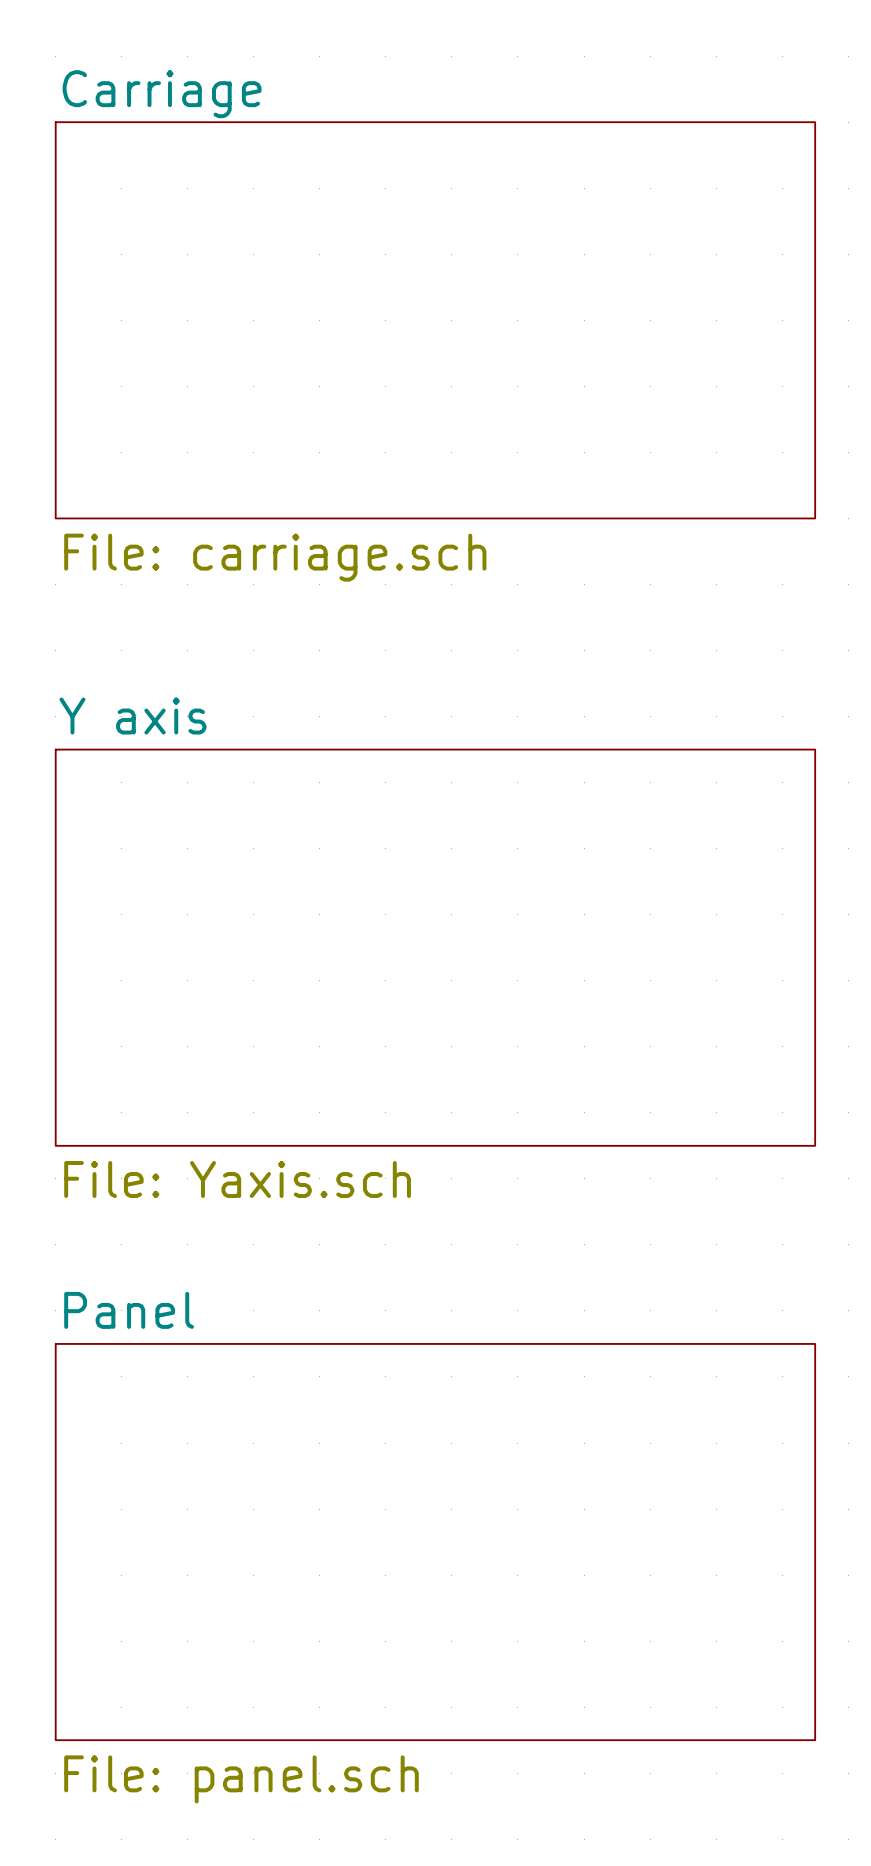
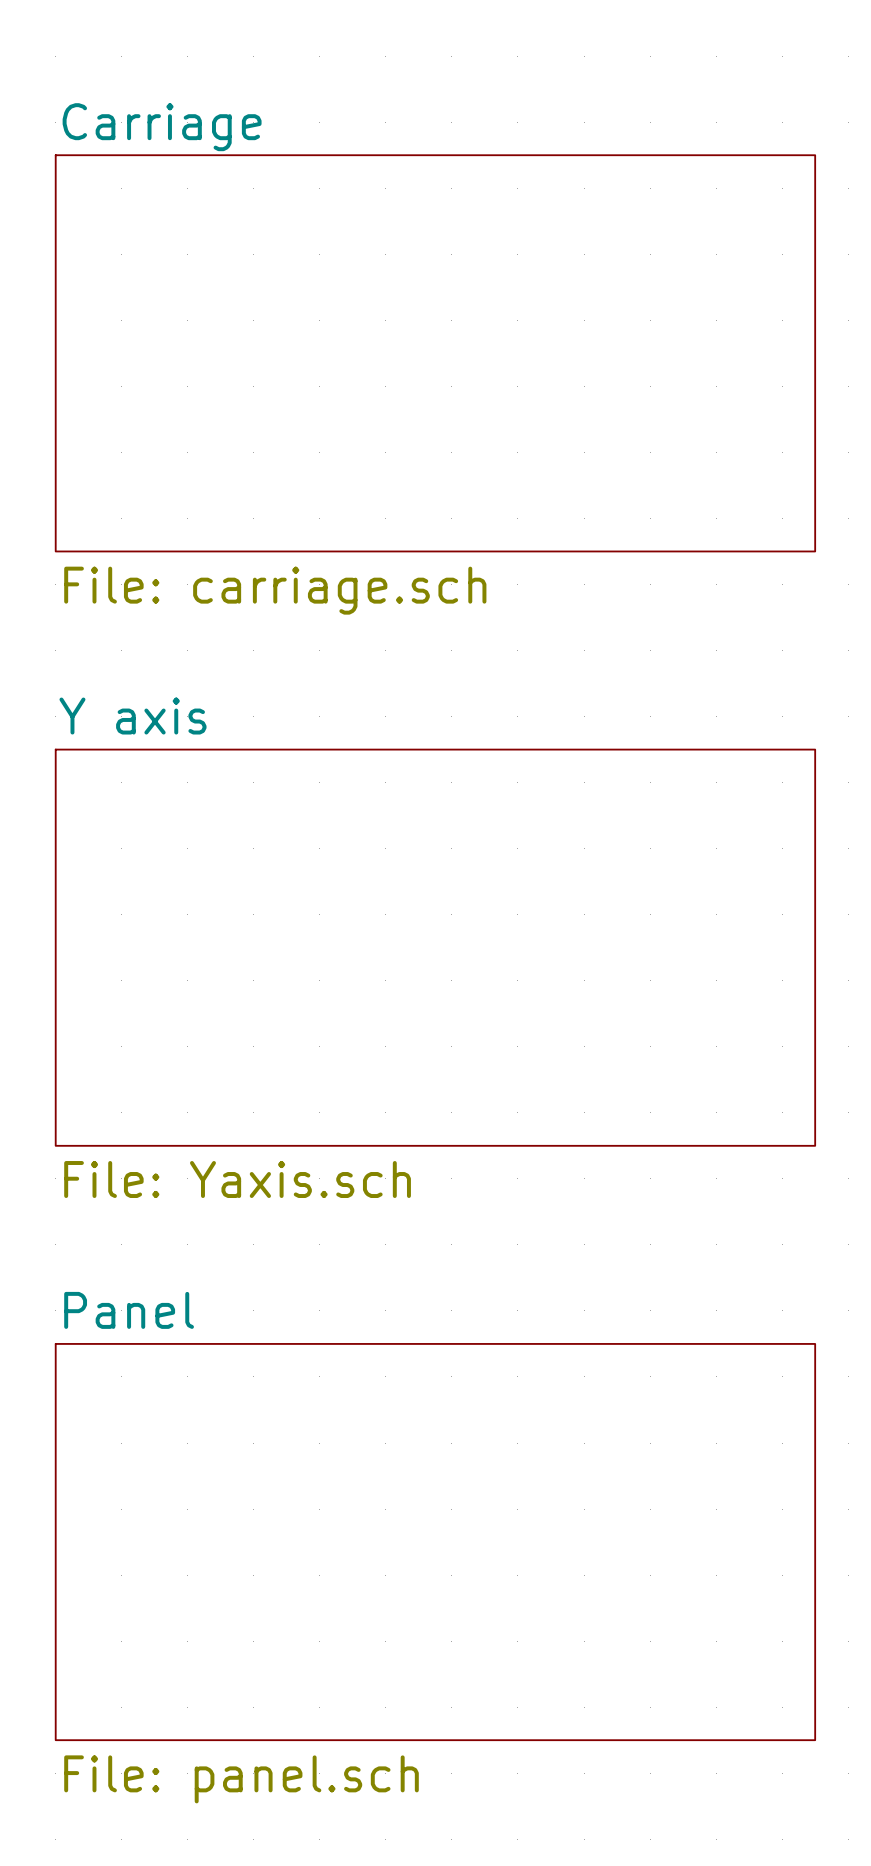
sheet Carriage position: (435, 320) -> (435, 353)

